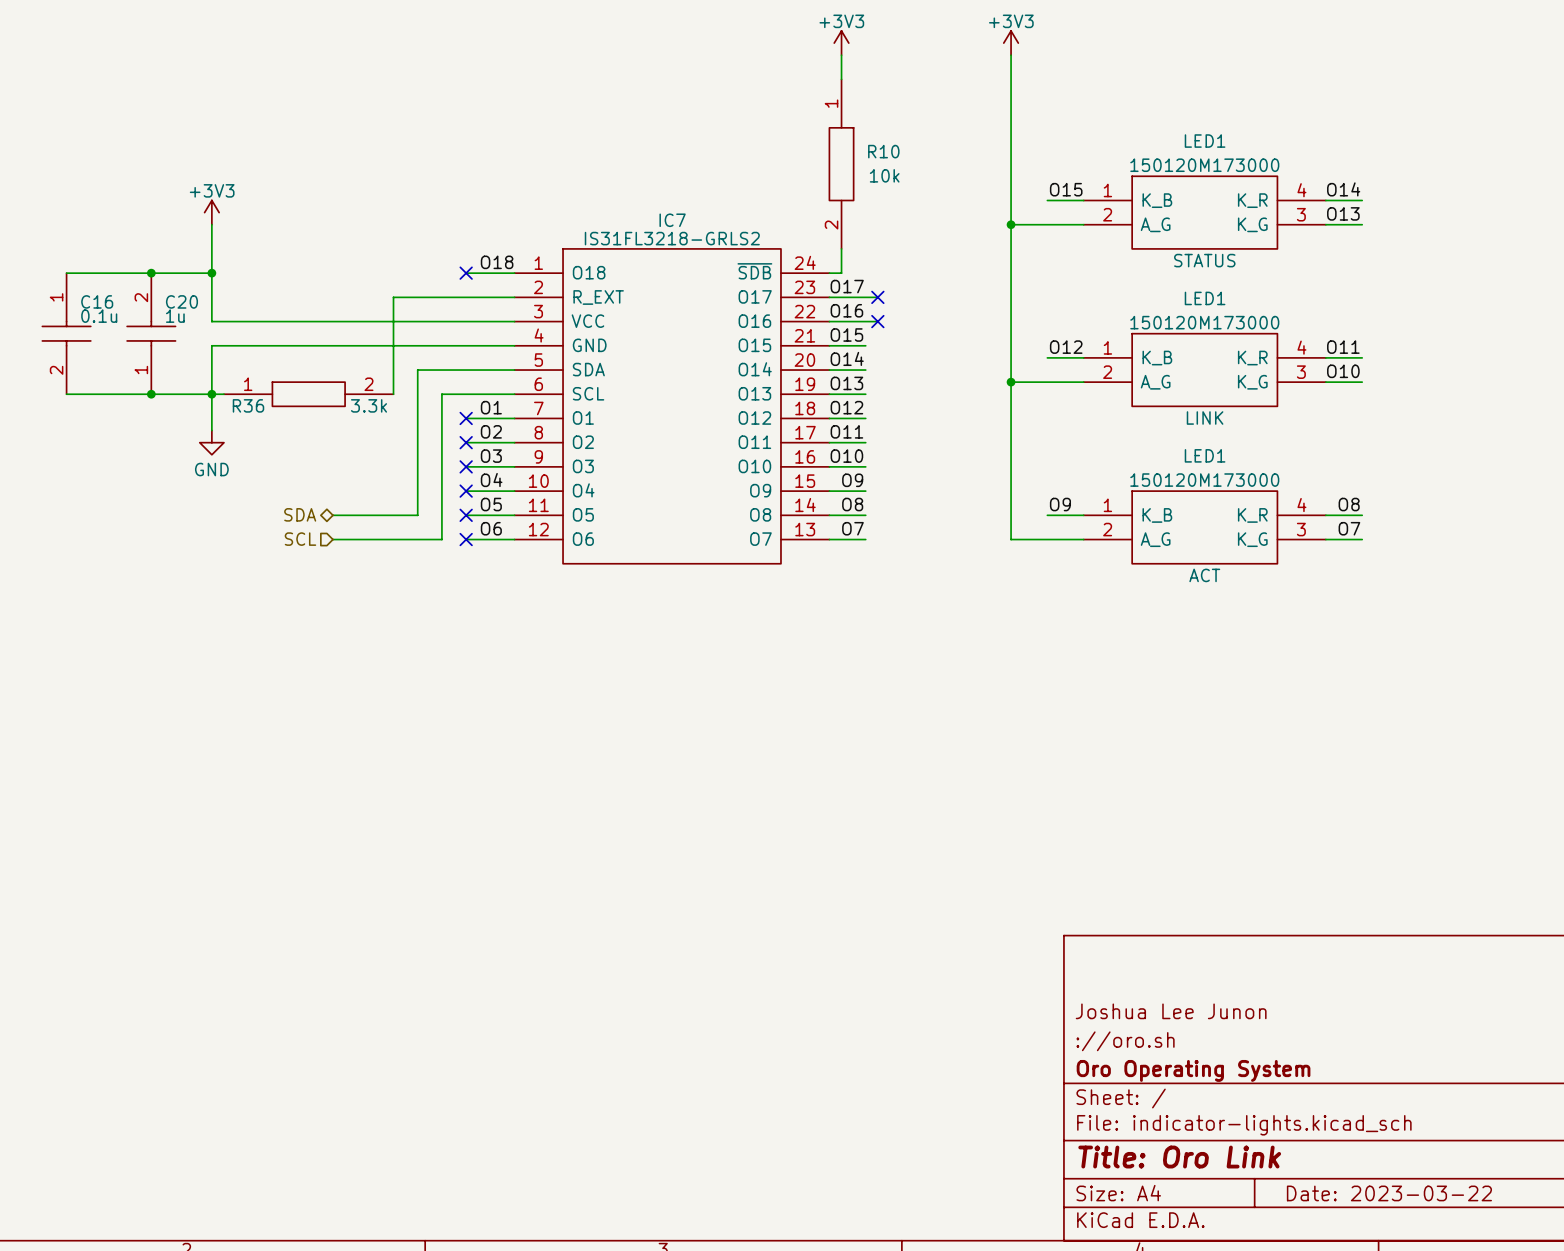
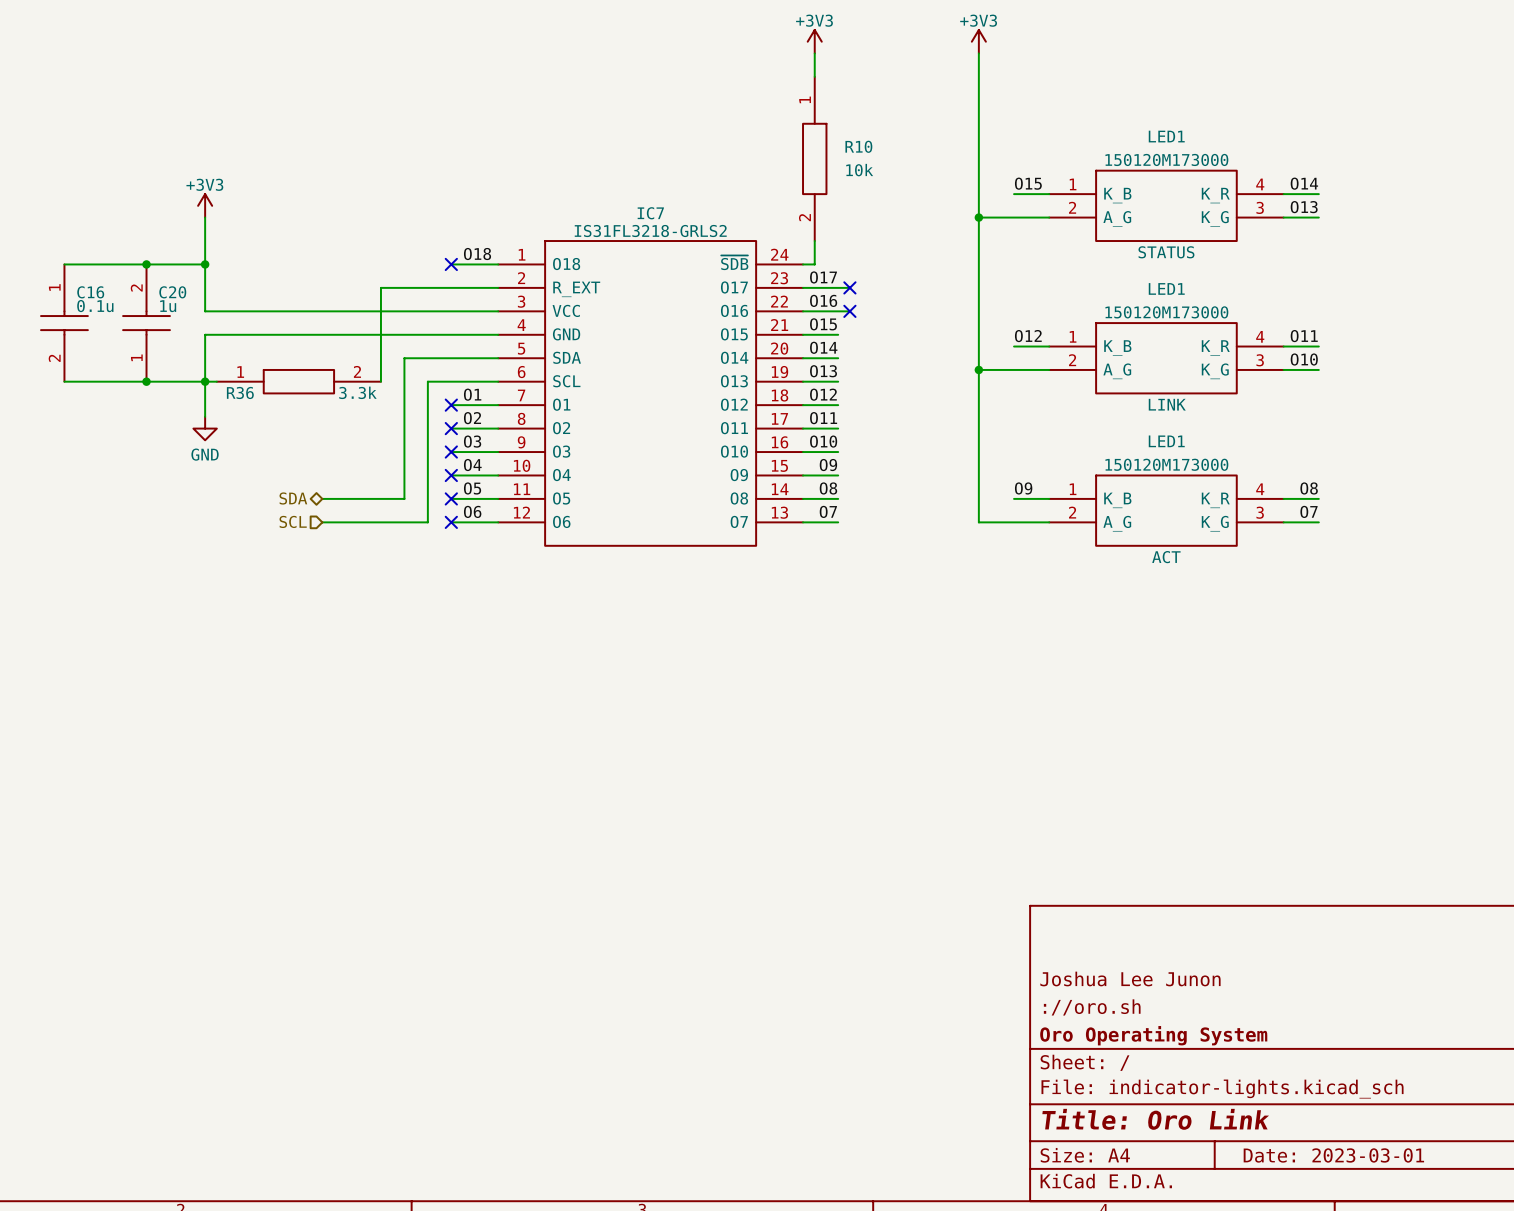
title block: Date: 2023-03-22 (1389, 1193) -> Date: 2023-03-01 (1333, 1155)

